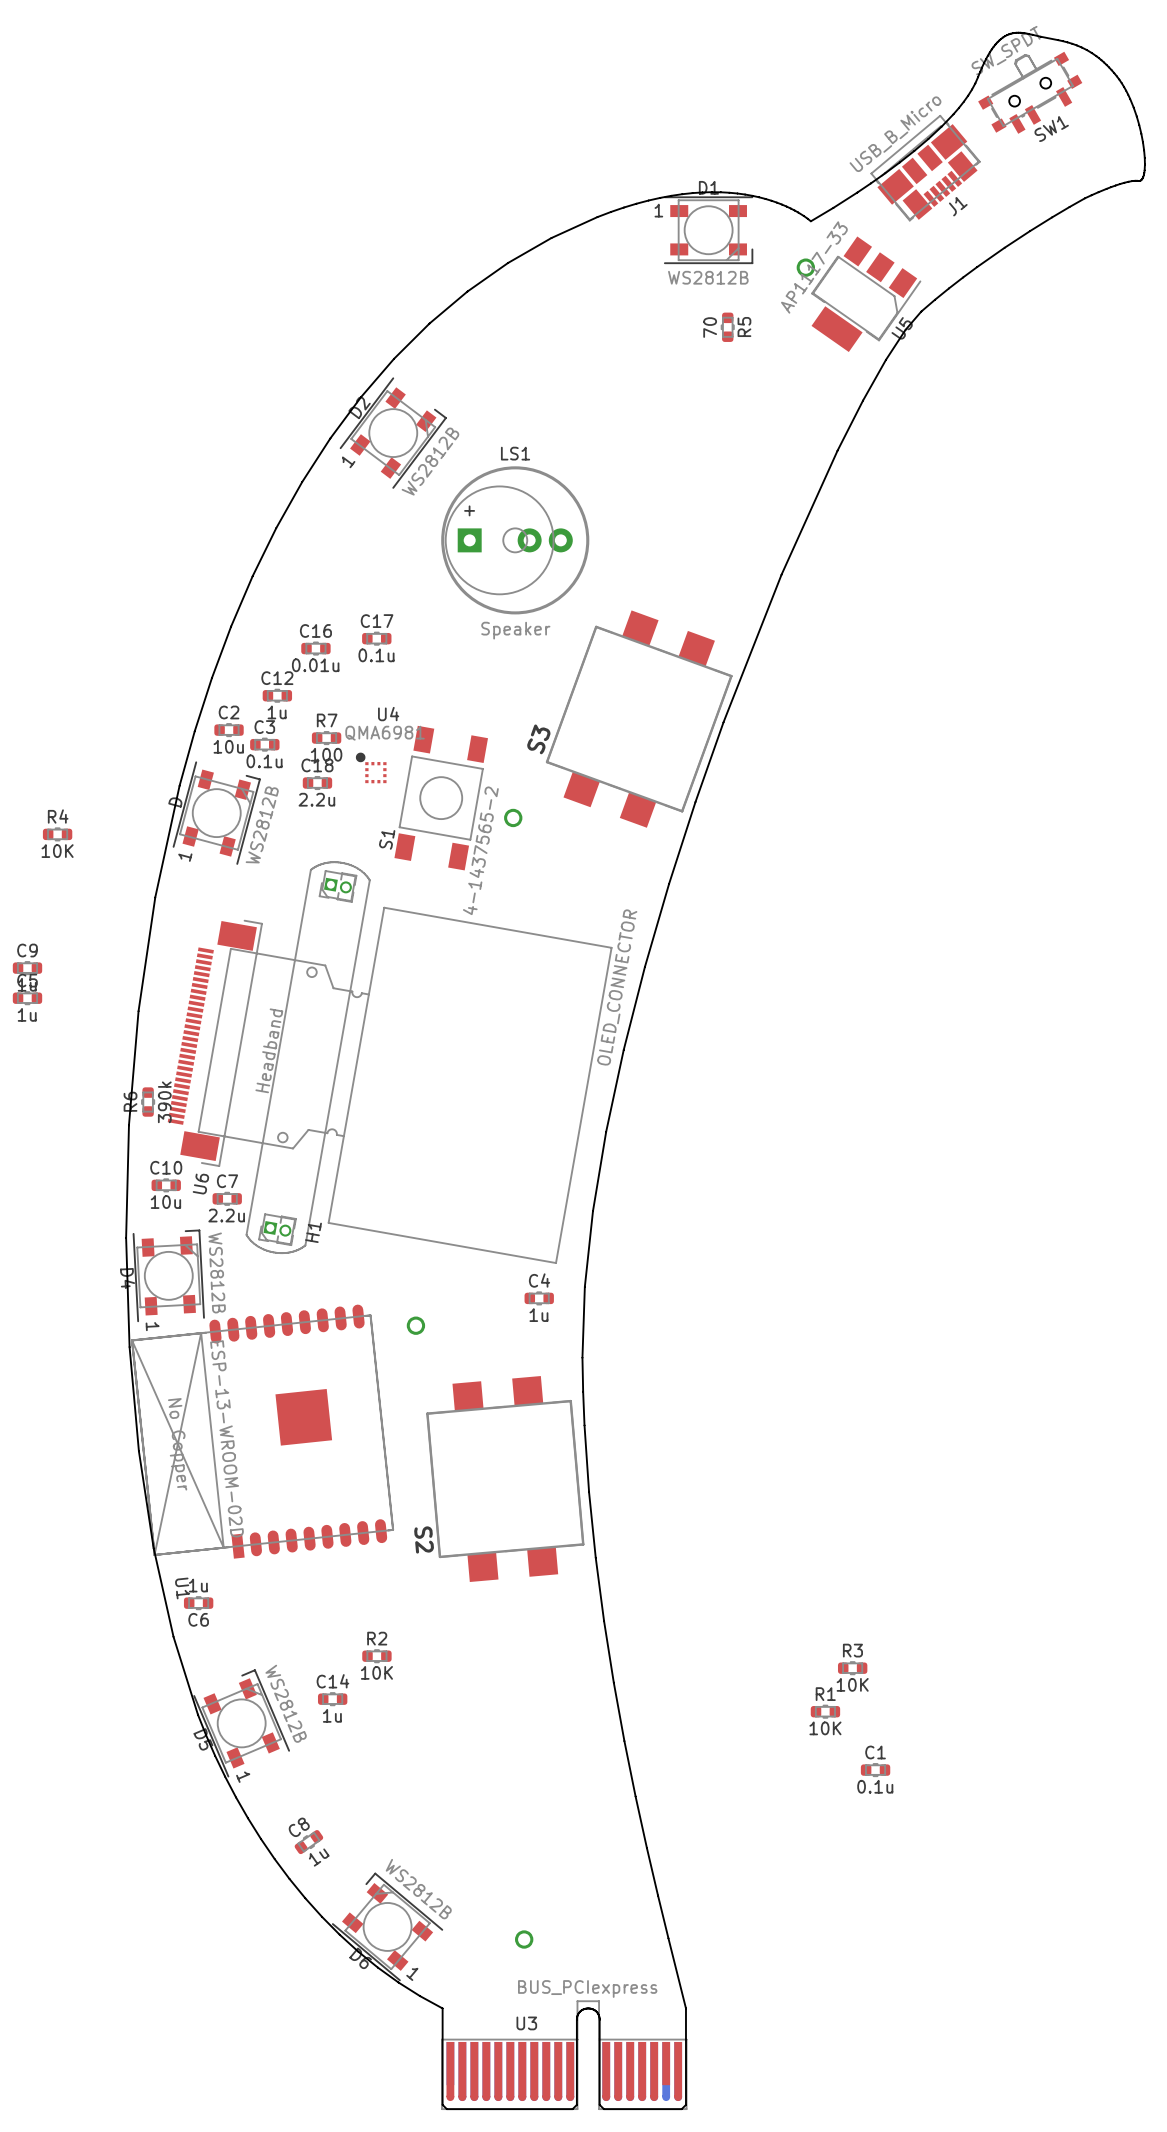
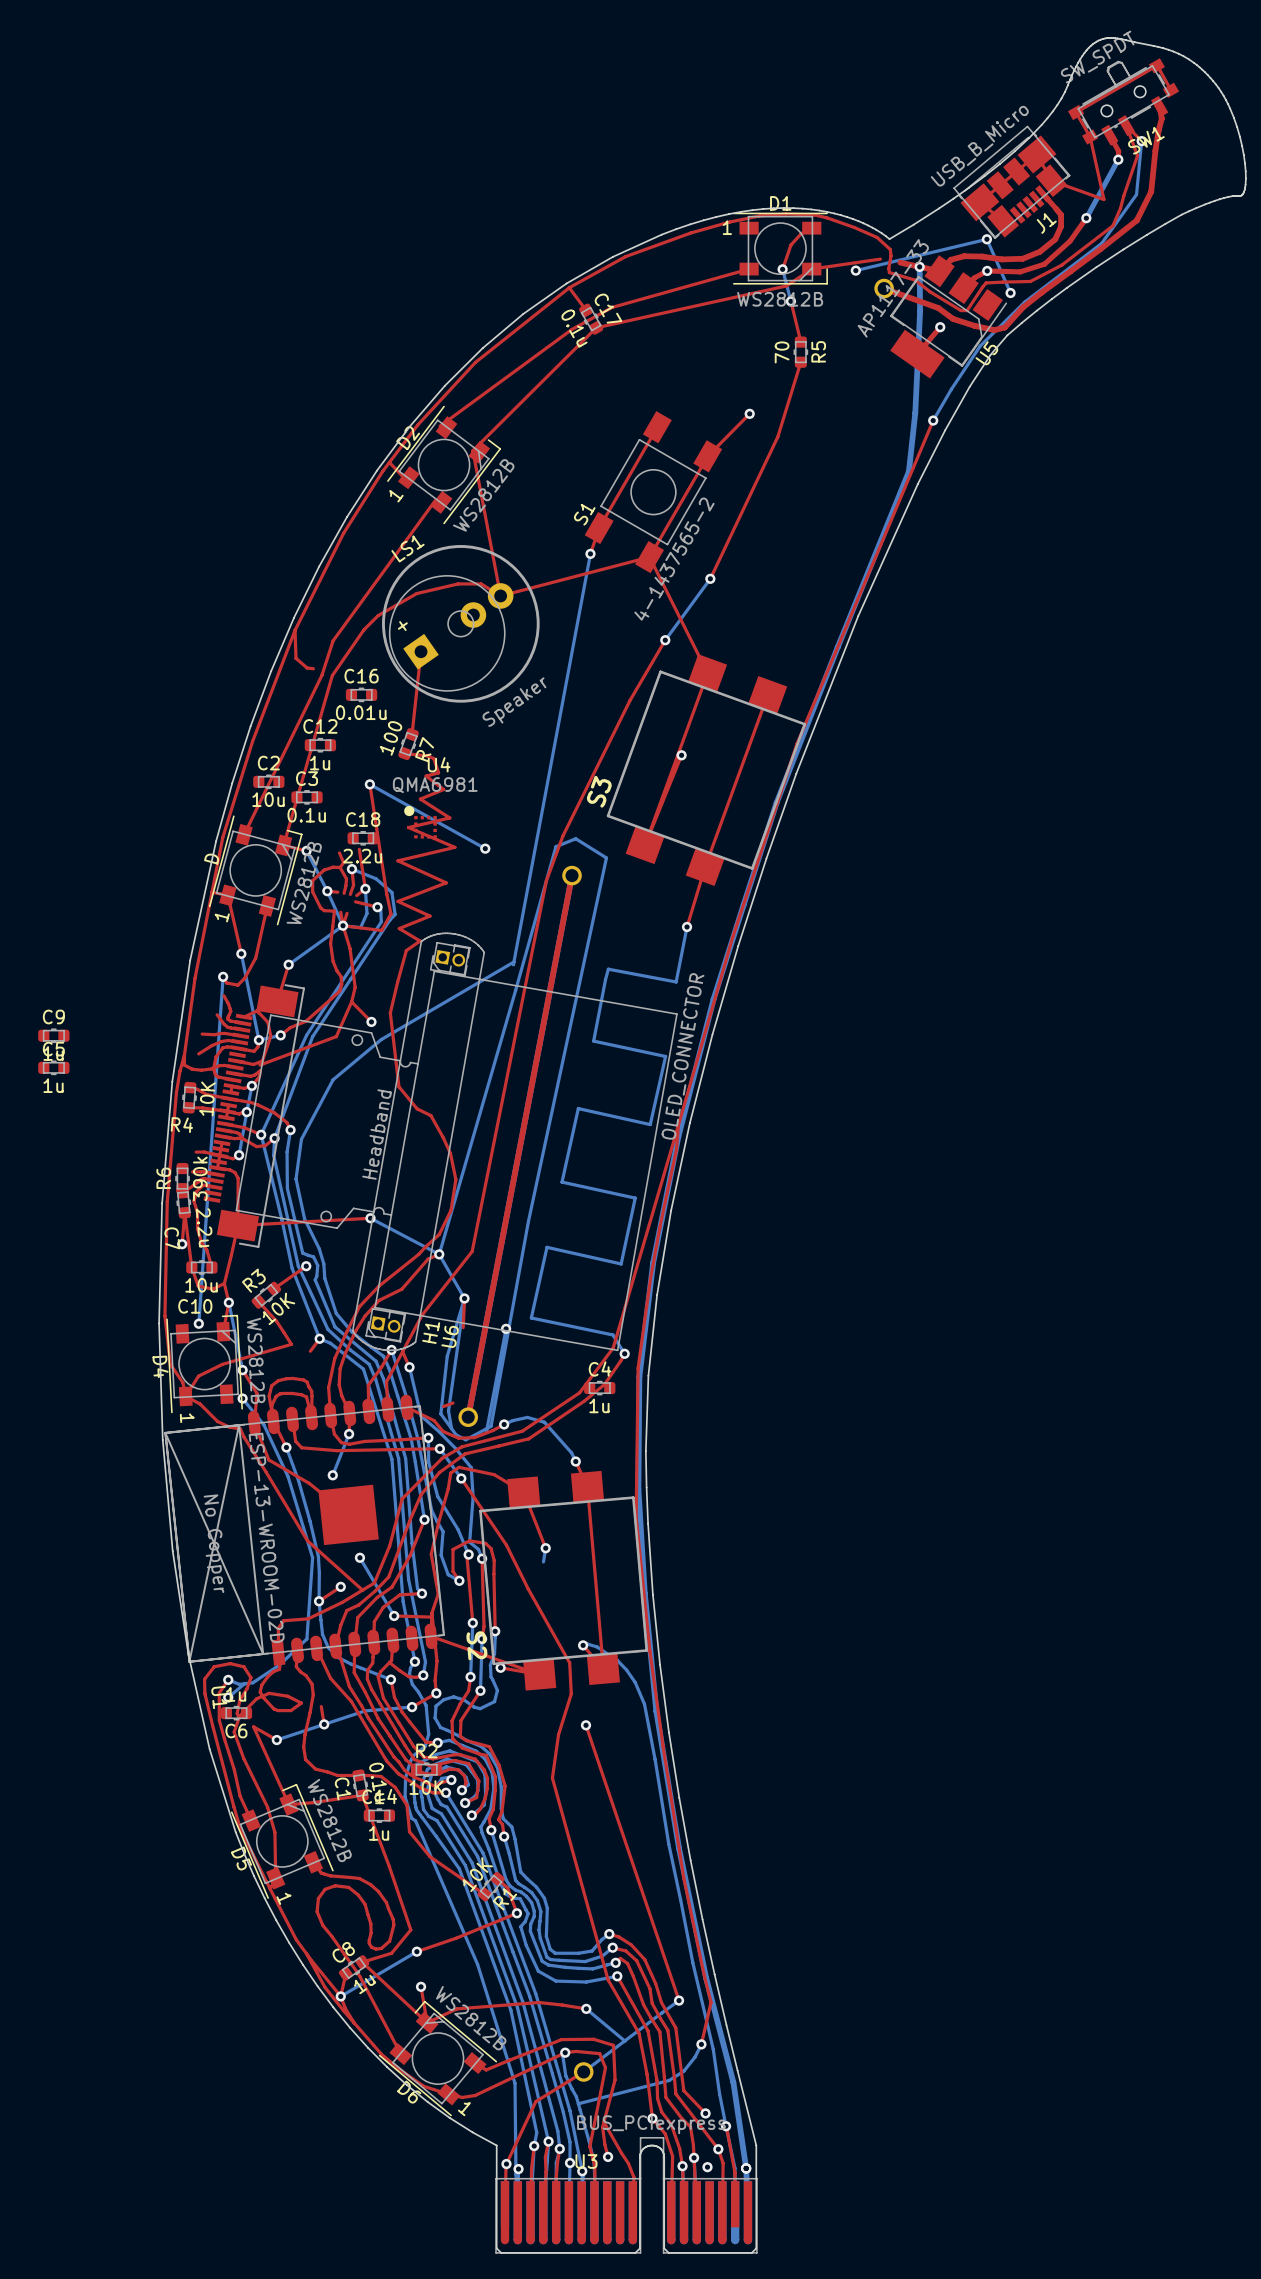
top track: none -> (1171, 90) (1156, 65) (1076, 112) (1090, 136) (1103, 199) (1051, 180) (1036, 154) (979, 202) (1003, 221)
top track: none -> (1159, 106) (1161, 118) (1155, 150) (1151, 191) (1136, 220) (1023, 307) (1004, 327) (994, 330) (974, 325) (953, 318) (938, 308) (884, 288)
top track: none -> (1109, 135) (1118, 151) (1118, 159)
top track: none -> (1141, 141) (1126, 125) (1137, 155) (1112, 225) (1061, 265) (1030, 281) (986, 282) (967, 310) (961, 310) (915, 280) (889, 272) (890, 249) (876, 237) (854, 227) (814, 214) (759, 215) (691, 232) (625, 256) (569, 287) (475, 362) (417, 424) (382, 471) (343, 533) (295, 630)
bottom track: none -> (1141, 141) (1136, 194) (1101, 243) (1024, 301) (980, 346) (933, 420)
via: none -> (1141, 141)
bottom track: none -> (1118, 159) (1086, 218)
via: none -> (1118, 159)
top track: none -> (1043, 193) (1061, 214) (1061, 226) (1055, 239) (1039, 251) (1022, 258) (1001, 259) (964, 256) (951, 259) (939, 271)
top track: none -> (1086, 218) (1070, 241) (1044, 264) (1020, 271) (987, 270) (974, 277) (963, 288)
via: none -> (1086, 218)
top track: none -> (811, 228) (801, 233) (790, 245) (782, 269)
via: none -> (986, 239)
top track: none -> (880, 259) (811, 269) (786, 285) (596, 327) (472, 450) (500, 595)
bottom track: none -> (919, 266) (920, 311) (915, 412) (908, 471) (776, 802) (713, 999) (678, 1136) (653, 1263) (639, 1376) (638, 1489) (644, 1593) (656, 1711) (679, 1848) (706, 1978) (733, 2082) (746, 2168) (747, 2210)
via: none -> (919, 266)
top track: none -> (749, 269) (612, 307) (571, 329) (440, 426)
bottom track: none -> (782, 269) (790, 301)
via: none -> (782, 269)
bottom track: none -> (855, 270) (986, 239) (1010, 292)
via: none -> (855, 270)
top track: none -> (939, 271) (900, 262) (939, 271)
via: none -> (987, 270)
top track: none -> (569, 287) (586, 310)
via: none -> (1010, 292)
top track: none -> (790, 301) (800, 342)
via: none -> (790, 301)
top track: none -> (940, 327) (917, 354)
via: none -> (940, 327)
top track: none -> (800, 362) (777, 436) (710, 578)
top track: none -> (749, 413) (707, 456) (649, 557)
via: none -> (749, 413)
top track: none -> (933, 420) (797, 743) (732, 937) (613, 1348) (579, 1392) (522, 1431) (461, 1446) (442, 1458) (402, 1498) (389, 1545) (374, 1583) (342, 1602) (308, 1618) (283, 1620) (278, 1628) (279, 1669) (273, 1671) (261, 1685) (260, 1692) (263, 1697)
via: none -> (933, 420)
top track: none -> (657, 427) (599, 528) (590, 553)
top track: none -> (389, 462) (402, 476)
top track: none -> (435, 500) (333, 640) (321, 675) (244, 834)
bottom track: none -> (590, 553) (513, 964)
via: none -> (590, 553)
top track: none -> (649, 557) (707, 673) (645, 845) (681, 755)
top track: none -> (649, 557) (500, 595)
bottom track: none -> (710, 578) (665, 640)
via: none -> (710, 578)
LS1 rotation: 0° (515, 540) -> 35° counterclockwise (460, 623)
LS1 position: (515, 540) -> (460, 623)
top track: none -> (500, 595) (481, 583) (458, 583) (416, 593) (378, 615) (363, 629) (332, 675) (283, 845) (306, 850)
top track: none -> (295, 630) (296, 658) (307, 668) (313, 668)
top track: none -> (295, 630) (252, 741) (222, 837) (194, 978) (184, 1055)
top track: none -> (665, 640) (630, 700) (562, 835) (546, 880) (472, 1251) (422, 1314) (386, 1381) (387, 1409)
via: none -> (665, 640)
top track: none -> (421, 651) (412, 734)
C17 rotation: 0° (376, 638) -> 60° clockwise (591, 319)
C17 position: (376, 638) -> (591, 319)
top track: none -> (767, 695) (705, 866) (687, 926)
top track: none -> (405, 753) (433, 758) (438, 772) (426, 776) (443, 789) (420, 799) (449, 817) (408, 827) (454, 847) (398, 860) (446, 882) (398, 901) (429, 916) (399, 928) (420, 941) (406, 950) (390, 1012) (398, 1086) (417, 1108) (430, 1115) (450, 1153) (455, 1179) (451, 1210) (439, 1234) (418, 1254) (379, 1286) (359, 1306) (334, 1358) (328, 1387) (334, 1434) (341, 1442) (349, 1444) (364, 1441) (428, 1437)
via: none -> (681, 755)
R7 name position: R7 (327, 720) -> R7 (424, 749)
top track: none -> (369, 784) (390, 913) (381, 930) (343, 925)
bottom track: none -> (369, 784) (485, 848)
via: none -> (369, 784)
R7 rotation: 0° (326, 738) -> 70° counterclockwise (408, 744)
R7 position: (326, 738) -> (408, 744)
R7 value position: 100 (326, 754) -> 100 (391, 738)
via: none -> (485, 848)
top track: none -> (359, 849) (365, 888) (356, 895)
bottom track: none -> (306, 850) (343, 925)
via: none -> (306, 850)
top track: none -> (339, 852) (343, 862) (340, 867)
S1 rotation: 0° (441, 798) -> 20° clockwise (653, 492)
S1 position: (441, 798) -> (653, 492)
top track: none -> (340, 867) (324, 870) (312, 880) (312, 891) (320, 907) (324, 910) (334, 911) (330, 943) (333, 961) (341, 976) (339, 990) (305, 1021) (290, 1027) (280, 1035)
top track: none -> (340, 867) (346, 879) (344, 893)
top track: none -> (351, 869) (353, 885) (350, 894)
bottom track: none -> (351, 869) (375, 878) (391, 892) (395, 914) (312, 1036) (274, 1138) (273, 1155) (298, 1265) (327, 1329) (369, 1364) (375, 1379) (398, 1458) (408, 1579) (425, 1662) (423, 1675)
via: none -> (351, 869)
R4 name position: R4 (58, 816) -> R4 (181, 1125)
top track: none -> (572, 875) (468, 1417)
bottom track: none -> (365, 888) (366, 913) (360, 927) (343, 925)
via: none -> (365, 888)
top track: none -> (327, 891) (337, 892)
via: none -> (327, 891)
top track: none -> (212, 892) (227, 895) (241, 953)
R4 rotation: 0° (57, 834) -> 86° counterclockwise (189, 1097)
R4 position: (57, 834) -> (189, 1097)
top track: none -> (355, 901) (377, 907)
top track: none -> (267, 905) (255, 958) (244, 978) (237, 985) (226, 982) (223, 976)
bottom track: none -> (377, 907) (380, 910) (381, 921) (306, 1035) (261, 1134) (292, 1268) (319, 1338) (330, 1343) (363, 1369) (391, 1459) (403, 1601) (414, 1661)
via: none -> (377, 907)
top track: none -> (340, 912) (343, 925)
top track: none -> (347, 913) (343, 925)
top track: none -> (343, 925) (350, 948) (355, 987) (351, 1001)
bottom track: none -> (343, 925) (288, 964)
via: none -> (343, 925)
bottom track: none -> (687, 926) (676, 981) (608, 969) (593, 1041) (665, 1056) (650, 1124) (578, 1108) (562, 1182) (635, 1198) (621, 1263) (546, 1247) (531, 1317) (612, 1334) (624, 1353)
via: none -> (687, 926)
bottom track: none -> (241, 953) (258, 1040) (280, 1035)
via: none -> (241, 953)
bottom track: none -> (513, 962) (381, 1039) (333, 1079) (301, 1139) (296, 1178) (304, 1219) (319, 1248) (323, 1263) (324, 1278) (336, 1313) (352, 1332) (383, 1356) (389, 1368) (411, 1438) (424, 1519)
top track: none -> (288, 964) (277, 1001) (244, 1016)
via: none -> (288, 964)
bottom track: none -> (223, 976) (198, 1323)
via: none -> (223, 976)
top track: none -> (224, 995) (230, 1011) (227, 1019) (243, 1023)
top track: none -> (351, 1001) (371, 1021)
top track: none -> (351, 1001) (336, 1036) (259, 1065)
top track: none -> (256, 1011) (267, 1022) (270, 1036) (262, 1060) (253, 1064) (236, 1061)
top track: none -> (217, 1014) (227, 1027) (241, 1029)
via: none -> (371, 1021)
top track: none -> (202, 1034) (225, 1033) (240, 1035)
via: none -> (280, 1035)
top track: none -> (258, 1040) (257, 1046) (254, 1051) (227, 1046) (222, 1047) (216, 1056) (213, 1067) (215, 1075) (233, 1079)
via: none -> (258, 1040)
top track: none -> (239, 1042) (221, 1041) (198, 1053)
top track: none -> (184, 1055) (184, 1065) (192, 1069) (201, 1070) (224, 1065) (235, 1067)
top track: none -> (184, 1055) (176, 1092) (167, 1201) (164, 1316) (170, 1364) (182, 1382) (185, 1396)
top track: none -> (234, 1073) (250, 1076) (260, 1070) (259, 1075) (251, 1085) (244, 1088) (231, 1086) (230, 1092)
bottom track: none -> (251, 1085) (239, 1155)
via: none -> (251, 1085)
top track: none -> (190, 1087) (206, 1094) (258, 1105) (274, 1112) (287, 1122) (290, 1130)
top track: none -> (228, 1105) (226, 1117)
top track: none -> (188, 1107) (202, 1107) (239, 1114) (246, 1112)
via: none -> (246, 1112)
top track: none -> (225, 1124) (244, 1127) (261, 1134)
top track: none -> (678, 1125) (676, 1149) (650, 1278) (638, 1368) (636, 1517) (649, 1651) (663, 1746) (683, 1878) (711, 2002) (701, 2044)
top track: none -> (224, 1130) (236, 1132) (242, 1138)
bottom track: none -> (290, 1130) (287, 1152) (287, 1188) (302, 1253) (313, 1256) (317, 1265) (315, 1279) (335, 1326) (375, 1361) (383, 1379) (405, 1458) (417, 1588) (421, 1593)
via: none -> (290, 1130)
H1 position: (308, 1057) -> (418, 1141)
via: none -> (261, 1134)
top track: none -> (223, 1136) (242, 1138)
top track: none -> (274, 1138) (265, 1145) (256, 1146) (242, 1138)
via: none -> (274, 1138)
top track: none -> (221, 1142) (217, 1168) (230, 1169) (234, 1172) (238, 1178) (237, 1225)
top track: none -> (196, 1152) (204, 1152) (233, 1158) (239, 1155)
via: none -> (239, 1155)
top track: none -> (192, 1171) (216, 1174)
top track: none -> (215, 1180) (200, 1179) (182, 1192)
top track: none -> (214, 1187) (201, 1186) (196, 1192) (194, 1201) (197, 1212) (197, 1228) (211, 1267)
top track: none -> (370, 1218) (237, 1225)
bottom track: none -> (370, 1218) (439, 1254)
via: none -> (370, 1218)
top track: none -> (237, 1225) (224, 1283)
top track: none -> (182, 1244) (184, 1212) (191, 1267) (198, 1286) (212, 1289) (224, 1283)
via: none -> (182, 1244)
C10 name position: C10 (166, 1167) -> C10 (195, 1306)
top track: none -> (439, 1254) (428, 1259) (401, 1289) (379, 1300) (365, 1316) (355, 1330) (340, 1368) (339, 1384) (349, 1413) (349, 1434)
bottom track: none -> (439, 1254) (464, 1298)
bottom track: none -> (439, 1254) (555, 846) (575, 838) (606, 857) (528, 1221) (491, 1426) (465, 1439) (456, 1435) (440, 1413) (447, 1356) (464, 1298)
via: none -> (439, 1254)
C7 name position: C7 (227, 1181) -> C7 (172, 1238)
U6 name position: U6 (200, 1184) -> U6 (450, 1336)
top track: none -> (306, 1266) (274, 1288)
via: none -> (306, 1266)
C7 rotation: 0° (227, 1198) -> 85° clockwise (183, 1202)
C7 position: (227, 1198) -> (183, 1202)
top track: none -> (224, 1283) (228, 1302) (223, 1331)
top track: none -> (464, 1298) (463, 1327)
bottom track: none -> (464, 1298) (448, 1411) (451, 1428)
via: none -> (464, 1298)
top track: none -> (258, 1301) (276, 1321) (291, 1344) (222, 1364) (198, 1376) (185, 1396)
bottom track: none -> (228, 1302) (242, 1370)
via: none -> (228, 1302)
H1 name position: H1 (313, 1232) -> H1 (431, 1333)
via: none -> (198, 1323)
bottom track: none -> (506, 1328) (486, 1430)
via: none -> (506, 1328)
top track: none -> (319, 1338) (310, 1351)
via: none -> (319, 1338)
top track: none -> (391, 1349) (368, 1385) (368, 1411)
bottom track: none -> (391, 1349) (417, 1438) (431, 1510) (443, 1531) (441, 1555) (448, 1574) (459, 1580)
via: none -> (391, 1349)
top track: none -> (402, 1351) (409, 1367)
top track: none -> (624, 1353) (604, 1384) (584, 1401) (528, 1438) (465, 1453) (439, 1472) (421, 1494) (388, 1576) (358, 1605) (346, 1610) (340, 1625) (335, 1646) (349, 1686) (394, 1757) (410, 1774) (435, 1786) (439, 1783) (451, 1779)
via: none -> (624, 1353)
bottom track: none -> (409, 1367) (421, 1415) (455, 1448) (471, 1467) (473, 1497) (469, 1542) (478, 1549) (482, 1558)
via: none -> (409, 1367)
top track: none -> (242, 1370) (257, 1393) (254, 1423) (268, 1459) (309, 1483) (348, 1514)
via: none -> (242, 1370)
top track: none -> (185, 1396) (200, 1404) (217, 1421) (229, 1427) (240, 1428) (307, 1540) (362, 1590)
bottom track: none -> (242, 1398) (264, 1425) (288, 1476) (312, 1557) (306, 1638) (279, 1664) (252, 1682) (239, 1684) (228, 1679)
via: none -> (242, 1398)
top track: none -> (452, 1403) (443, 1406)
top track: none -> (406, 1407) (434, 1420) (443, 1431) (458, 1438) (474, 1437) (504, 1424)
top track: none -> (292, 1419) (295, 1441) (301, 1447) (336, 1450) (439, 1448)
top track: none -> (273, 1421) (271, 1405) (276, 1396) (280, 1393) (292, 1393) (306, 1396) (311, 1417) (311, 1391) (307, 1382) (303, 1380) (286, 1378) (278, 1380) (271, 1385) (269, 1396) (273, 1421)
top track: none -> (273, 1421) (286, 1447)
bottom track: none -> (504, 1424) (527, 1417) (544, 1422) (571, 1452) (575, 1461)
via: none -> (504, 1424)
bottom track: none -> (349, 1434) (332, 1475)
via: none -> (349, 1434)
bottom track: none -> (428, 1437) (428, 1462) (437, 1496) (458, 1529) (468, 1554)
via: none -> (428, 1437)
bottom track: none -> (286, 1447) (298, 1480) (318, 1556) (320, 1620) (322, 1634) (328, 1647) (338, 1657) (351, 1664) (390, 1679)
via: none -> (286, 1447)
bottom track: none -> (439, 1448) (461, 1478)
via: none -> (439, 1448)
top track: none -> (575, 1461) (587, 1486) (603, 1669) (583, 1645)
via: none -> (575, 1461)
via: none -> (332, 1475)
top track: none -> (461, 1478) (506, 1544) (528, 1588) (569, 1662) (571, 1693) (558, 1734) (552, 1778) (608, 1979) (639, 2033) (647, 2074) (652, 2118) (665, 2133) (672, 2156) (671, 2210)
via: none -> (461, 1478)
top track: none -> (424, 1519) (410, 1555) (391, 1587) (377, 1597) (357, 1617) (354, 1672) (378, 1718) (406, 1759) (422, 1772) (428, 1774) (449, 1769) (458, 1769) (464, 1775) (466, 1782) (461, 1790)
via: none -> (424, 1519)
top track: none -> (545, 1548) (523, 1492) (494, 1474) (459, 1467) (450, 1473) (431, 1554) (438, 1594) (431, 1613)
bottom track: none -> (545, 1548) (543, 1561)
via: none -> (545, 1548)
via: none -> (468, 1554)
bottom track: none -> (359, 1557) (394, 1615)
via: none -> (359, 1557)
top track: none -> (467, 1558) (472, 1623)
top track: none -> (482, 1558) (484, 1626) (482, 1638)
via: none -> (482, 1558)
top track: none -> (459, 1580) (452, 1571) (452, 1549) (469, 1540) (485, 1543) (491, 1548) (494, 1560) (495, 1631)
via: none -> (459, 1580)
top track: none -> (340, 1586) (319, 1601)
via: none -> (340, 1586)
top track: none -> (421, 1593) (399, 1594) (383, 1607) (374, 1621) (372, 1662) (367, 1670) (367, 1678) (371, 1689) (414, 1759) (429, 1765) (454, 1760) (468, 1763) (478, 1781) (476, 1797) (465, 1803)
via: none -> (421, 1593)
via: none -> (319, 1601)
top track: none -> (431, 1613) (431, 1636) (539, 1674) (500, 1667)
top track: none -> (431, 1613) (437, 1661) (435, 1680) (436, 1693) (412, 1707)
top track: none -> (394, 1615) (432, 1617)
via: none -> (394, 1615)
bottom track: none -> (472, 1623) (470, 1677)
via: none -> (472, 1623)
bottom track: none -> (495, 1631) (494, 1653) (490, 1665) (491, 1677) (497, 1690) (494, 1701) (480, 1708) (453, 1696) (443, 1699) (436, 1706) (435, 1717) (440, 1727) (481, 1746) (489, 1753) (497, 1767) (501, 1787) (503, 1818) (511, 1826) (520, 1872) (536, 1887) (544, 1898) (547, 1908) (546, 1936) (550, 1949) (555, 1953) (592, 1951) (609, 1934)
via: none -> (495, 1631)
bottom track: none -> (482, 1638) (480, 1690)
via: none -> (482, 1638)
top track: none -> (392, 1640) (391, 1660) (378, 1676) (383, 1698) (413, 1746) (423, 1756) (433, 1758) (460, 1754) (475, 1759) (484, 1770) (487, 1778) (485, 1798) (480, 1808) (475, 1814) (471, 1815)
bottom track: none -> (583, 1645) (587, 1644) (597, 1646) (617, 1660) (635, 1682) (644, 1704) (668, 1844) (692, 1962) (713, 2049) (719, 2094) (734, 2168) (735, 2210)
via: none -> (583, 1645)
top track: none -> (316, 1648) (330, 1678) (351, 1701) (386, 1760) (398, 1773) (420, 1787) (433, 1792) (445, 1792)
top track: none -> (297, 1650) (296, 1666) (312, 1684) (313, 1694) (304, 1734) (303, 1747) (305, 1759) (315, 1769) (337, 1775) (381, 1776) (395, 1787) (406, 1805) (409, 1831) (429, 1856) (484, 1894)
bottom track: none -> (414, 1661) (410, 1668) (409, 1674) (412, 1684) (426, 1705) (428, 1734) (425, 1746) (413, 1755) (410, 1762) (405, 1777) (405, 1796) (411, 1818) (415, 1820) (477, 1964) (515, 2083) (517, 2210) (518, 2169)
via: none -> (414, 1661)
top track: none -> (389, 1662) (408, 1676) (423, 1675)
via: none -> (500, 1667)
via: none -> (423, 1675)
top track: none -> (470, 1677) (468, 1690) (452, 1720) (452, 1738) (462, 1748) (486, 1755) (491, 1767) (495, 1777) (493, 1809) (489, 1818) (491, 1830)
via: none -> (470, 1677)
top track: none -> (228, 1679) (219, 1693) (219, 1720) (240, 1795) (251, 1820)
via: none -> (228, 1679)
top track: none -> (390, 1679) (394, 1697) (402, 1712) (426, 1742) (437, 1742)
via: none -> (390, 1679)
bottom track: none -> (244, 1683) (228, 1697)
top track: none -> (480, 1690) (460, 1720) (460, 1736) (466, 1740) (489, 1746) (499, 1765) (505, 1786) (501, 1811) (498, 1819) (502, 1824) (504, 1836)
via: none -> (480, 1690)
via: none -> (436, 1693)
top track: none -> (262, 1696) (273, 1709) (278, 1710) (290, 1710) (301, 1703) (287, 1696) (269, 1693) (256, 1698) (239, 1716) (234, 1732) (243, 1758) (267, 1807) (274, 1832) (275, 1878) (270, 1889)
via: none -> (228, 1697)
top track: none -> (321, 1706) (324, 1724)
bottom track: none -> (412, 1707) (365, 1710) (276, 1740)
via: none -> (412, 1707)
top track: none -> (239, 1718) (237, 1713) (239, 1700) (250, 1677) (243, 1666) (230, 1663) (214, 1666) (204, 1679) (204, 1693) (240, 1829) (296, 1939) (340, 1996)
via: none -> (324, 1724)
top track: none -> (586, 1725) (679, 2000)
via: none -> (586, 1725)
top track: none -> (276, 1740) (253, 1726) (288, 1804) (362, 1795) (410, 1929) (391, 1953) (362, 1962) (427, 2022)
via: none -> (276, 1740)
bottom track: none -> (437, 1742) (449, 1740) (476, 1751) (484, 1758) (492, 1772) (493, 1788) (490, 1809) (480, 1826) (482, 1832) (506, 1894) (512, 1898) (520, 1898) (528, 1913) (520, 1926) (526, 1945) (538, 1971) (555, 1981) (586, 1982) (617, 1976)
via: none -> (437, 1742)
bottom track: none -> (451, 1779) (441, 1778) (435, 1786) (435, 1793) (441, 1804) (446, 1807) (477, 1856) (529, 1996) (563, 2112) (570, 2142) (568, 2210)
via: none -> (451, 1779)
R3 rotation: 0° (852, 1668) -> 40° counterclockwise (266, 1295)
R3 position: (852, 1668) -> (266, 1295)
bottom track: none -> (461, 1790) (468, 1784) (466, 1777) (459, 1770) (446, 1766) (431, 1773) (426, 1791) (432, 1808) (441, 1813) (471, 1862) (522, 2001) (557, 2131) (559, 2148) (556, 2163) (556, 2210)
via: none -> (461, 1790)
bottom track: none -> (445, 1792) (483, 1853) (535, 1993) (570, 2110) (583, 2175) (581, 2210) (582, 2171)
via: none -> (445, 1792)
bottom track: none -> (465, 1803) (476, 1795) (477, 1790) (477, 1779) (466, 1764) (447, 1758) (427, 1769) (420, 1791) (423, 1809) (428, 1816) (437, 1820) (465, 1865) (517, 2007) (548, 2141) (543, 2210)
via: none -> (465, 1803)
R1 name position: R1 (825, 1694) -> R1 (504, 1899)
bottom track: none -> (471, 1815) (484, 1805) (485, 1794) (484, 1774) (477, 1761) (449, 1750) (436, 1754) (415, 1764) (413, 1786) (416, 1809) (459, 1868) (510, 2010) (536, 2132) (530, 2210)
via: none -> (471, 1815)
R1 rotation: 0° (825, 1711) -> 50° counterclockwise (491, 1886)
R1 position: (825, 1711) -> (491, 1886)
bottom track: none -> (491, 1830) (506, 1879) (509, 1885) (521, 1892) (531, 1902) (534, 1916) (530, 1931) (542, 1961) (548, 1965) (592, 1968) (615, 1962)
via: none -> (491, 1830)
bottom track: none -> (504, 1836) (515, 1880) (531, 1892) (537, 1900) (540, 1911) (540, 1938) (546, 1957) (550, 1959) (585, 1961) (602, 1956) (614, 1946)
via: none -> (504, 1836)
R1 value position: 10K (825, 1728) -> 10K (477, 1874)
top track: none -> (313, 1862) (321, 1873) (330, 1875) (359, 1878) (370, 1884) (386, 1902) (393, 1925) (389, 1941) (381, 1948) (375, 1949) (369, 1943) (370, 1923) (365, 1904) (358, 1895) (348, 1887) (335, 1885) (325, 1889) (318, 1898) (317, 1911) (322, 1925) (359, 1976) (400, 2054)
C1 name position: C1 (875, 1752) -> C1 (343, 1788)
top track: none -> (497, 1878) (507, 1888) (516, 1913) (456, 1938) (416, 1951)
C1 rotation: 0° (875, 1770) -> 80° clockwise (360, 1785)
C1 position: (875, 1770) -> (360, 1785)
C1 value position: 0.1u (875, 1786) -> 0.1u (378, 1782)
via: none -> (516, 1913)
top track: none -> (609, 1934) (618, 1936) (631, 1944) (644, 1959) (661, 2002) (675, 2028) (683, 2090) (705, 2113)
via: none -> (609, 1934)
top track: none -> (612, 1947) (625, 1951) (636, 1960) (649, 1988) (652, 2003) (667, 2030) (675, 2093) (718, 2149) (723, 2163) (722, 2210)
via: none -> (612, 1947)
bottom track: none -> (416, 1951) (340, 1996)
via: none -> (416, 1951)
top track: none -> (306, 1953) (325, 1987) (354, 2022)
top track: none -> (615, 1962) (620, 1958) (627, 1963) (643, 2004) (659, 2031) (665, 2097) (690, 2126) (693, 2145) (696, 2210)
via: none -> (615, 1962)
top track: none -> (345, 1973) (340, 1996)
top track: none -> (617, 1976) (648, 2030) (656, 2080) (657, 2098) (661, 2112) (671, 2123) (679, 2148) (682, 2166) (684, 2210)
via: none -> (617, 1976)
top track: none -> (421, 1986) (427, 2022)
via: none -> (421, 1986)
top track: none -> (340, 1996) (354, 2022)
via: none -> (340, 1996)
bottom track: none -> (679, 2000) (583, 2071)
via: none -> (679, 2000)
top track: none -> (586, 2008) (539, 2002) (456, 2008) (427, 2022)
bottom track: none -> (586, 2008) (624, 2040)
via: none -> (586, 2008)
top track: none -> (354, 2022) (381, 2054) (423, 2086) (462, 2097) (475, 2095) (565, 2052) (576, 2051) (599, 2053) (605, 2067) (589, 2146) (594, 2166) (594, 2210)
bottom track: none -> (701, 2044) (695, 2057) (683, 2071) (669, 2080) (578, 2103)
via: none -> (701, 2044)
bottom track: none -> (565, 2052) (562, 2057) (565, 2076) (576, 2096) (593, 2161) (594, 2210)
via: none -> (565, 2052)
top track: none -> (475, 2063) (486, 2069) (561, 2039) (593, 2039) (613, 2045) (615, 2079) (603, 2122)
top track: none -> (583, 2071) (535, 2101) (506, 2164) (504, 2210)
via: none -> (705, 2113)
via: none -> (652, 2118)
top track: none -> (603, 2122) (628, 2163) (633, 2177) (632, 2210)
top track: none -> (603, 2122) (602, 2127) (608, 2156)
top track: none -> (726, 2126) (734, 2172) (735, 2204)
via: none -> (726, 2126)
top track: none -> (548, 2141) (545, 2157) (543, 2210)
via: none -> (548, 2141)
top track: none -> (534, 2146) (530, 2210)
via: none -> (534, 2146)
top track: none -> (559, 2148) (556, 2177) (556, 2210)
via: none -> (559, 2148)
via: none -> (718, 2149)
via: none -> (608, 2156)
via: none -> (694, 2157)
via: none -> (570, 2163)
via: none -> (506, 2164)
via: none -> (682, 2166)
via: none -> (707, 2167)
via: none -> (746, 2168)
via: none -> (518, 2169)
via: none -> (582, 2171)

